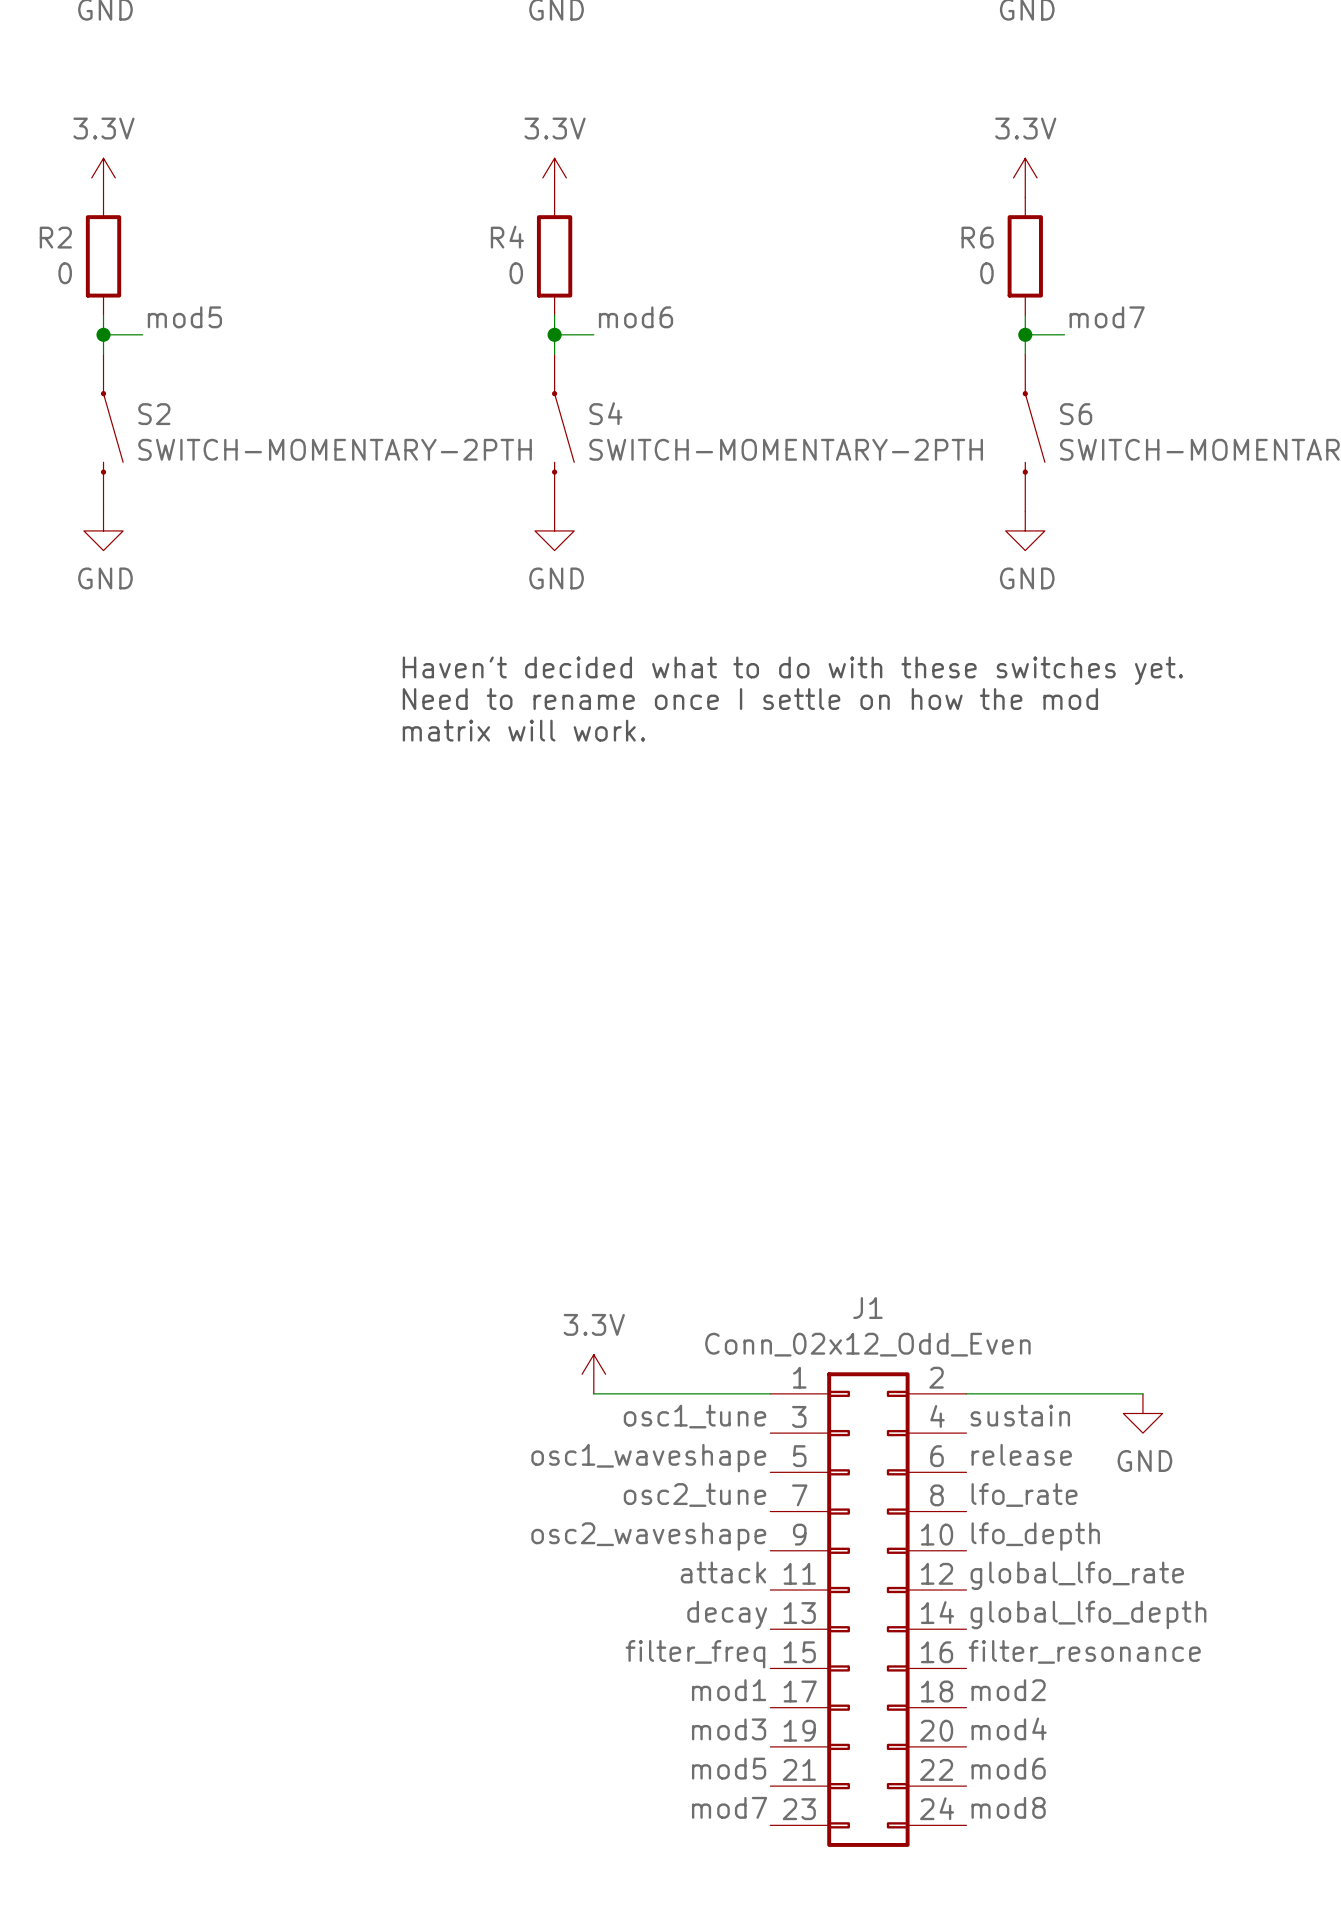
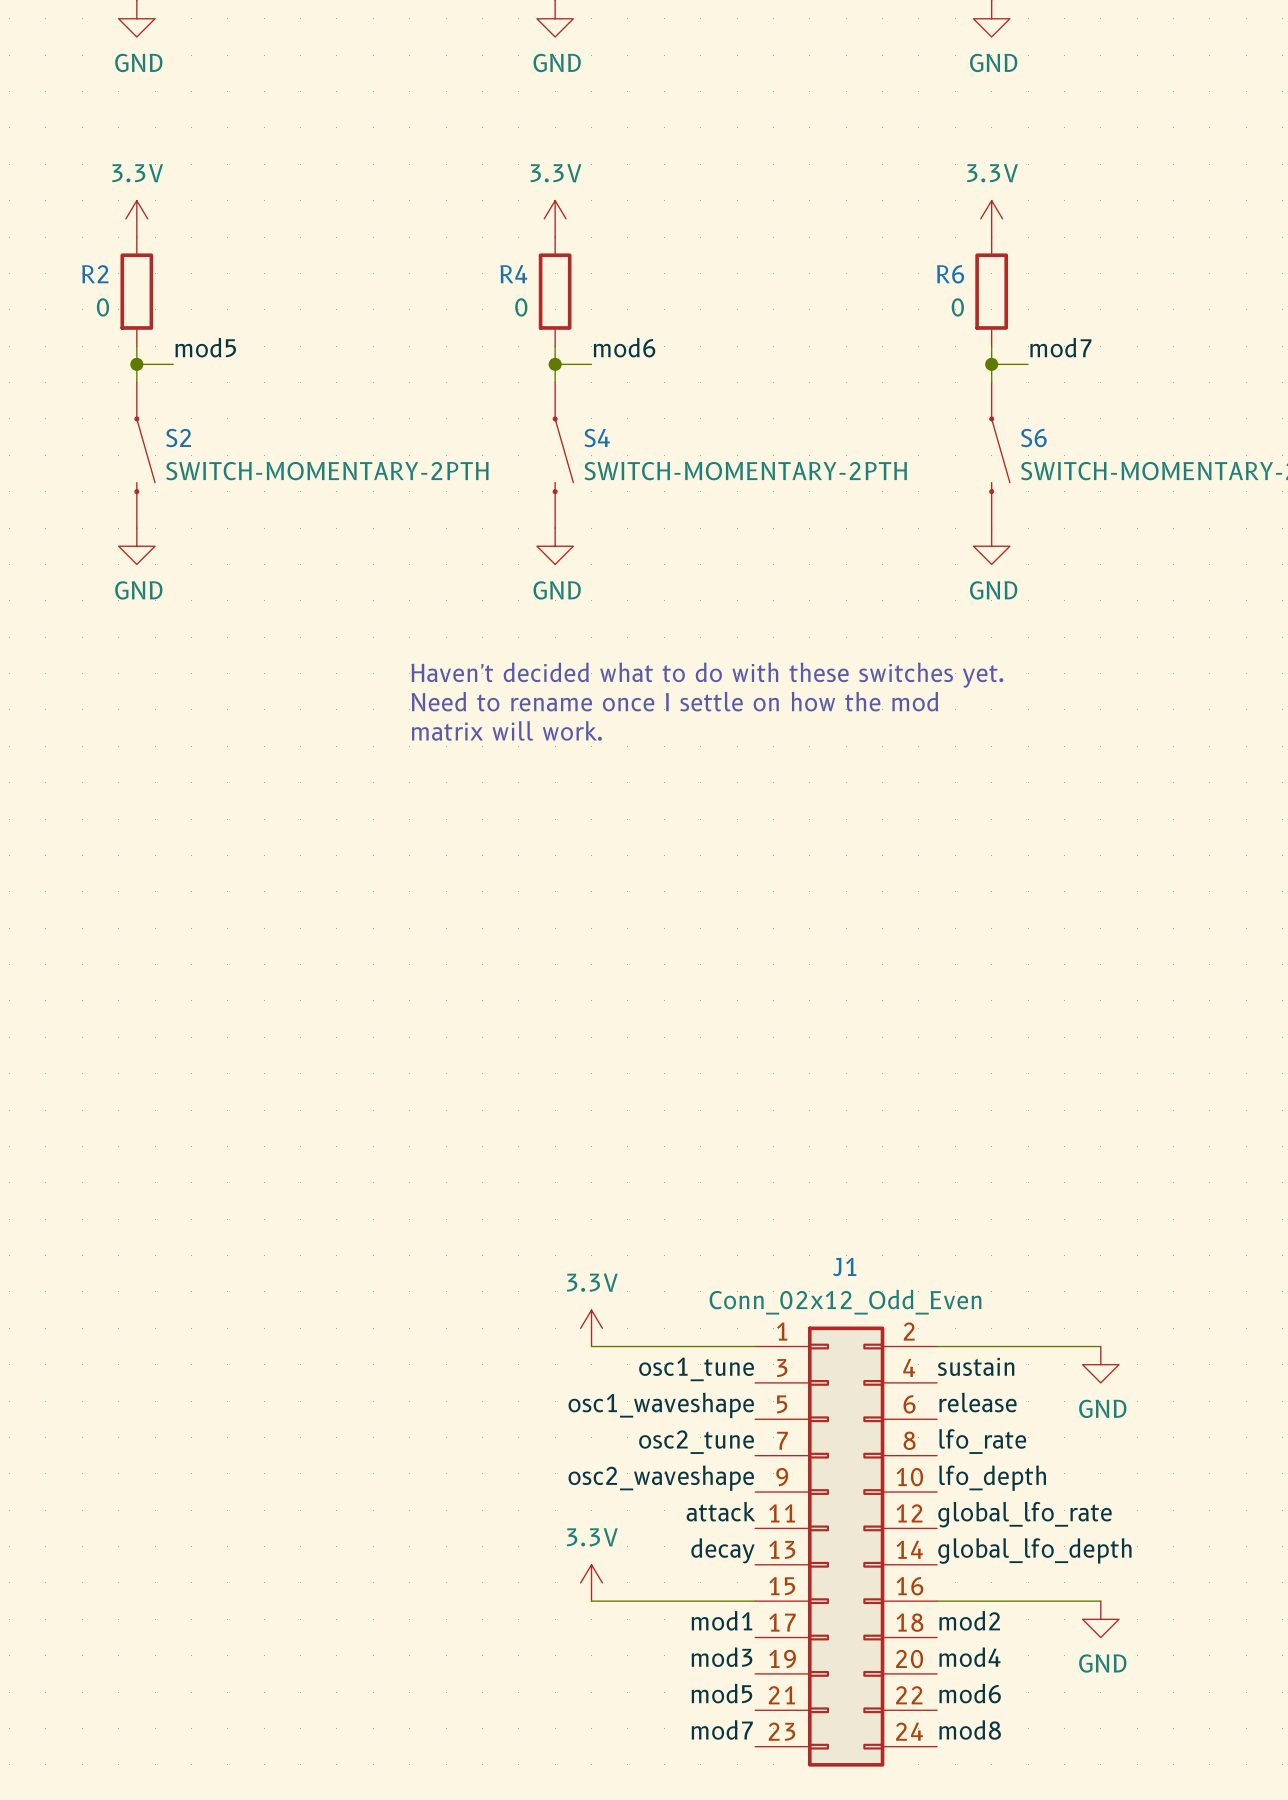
power symbol: none -> 3.3V (591, 1582)
label: filter_resonance (1084, 1651) -> none
label: filter_freq (695, 1654) -> none
wire: none -> (591, 1601) (755, 1601)
wire: none -> (937, 1601) (1100, 1601)
power symbol: none -> GND (1100, 1619)

